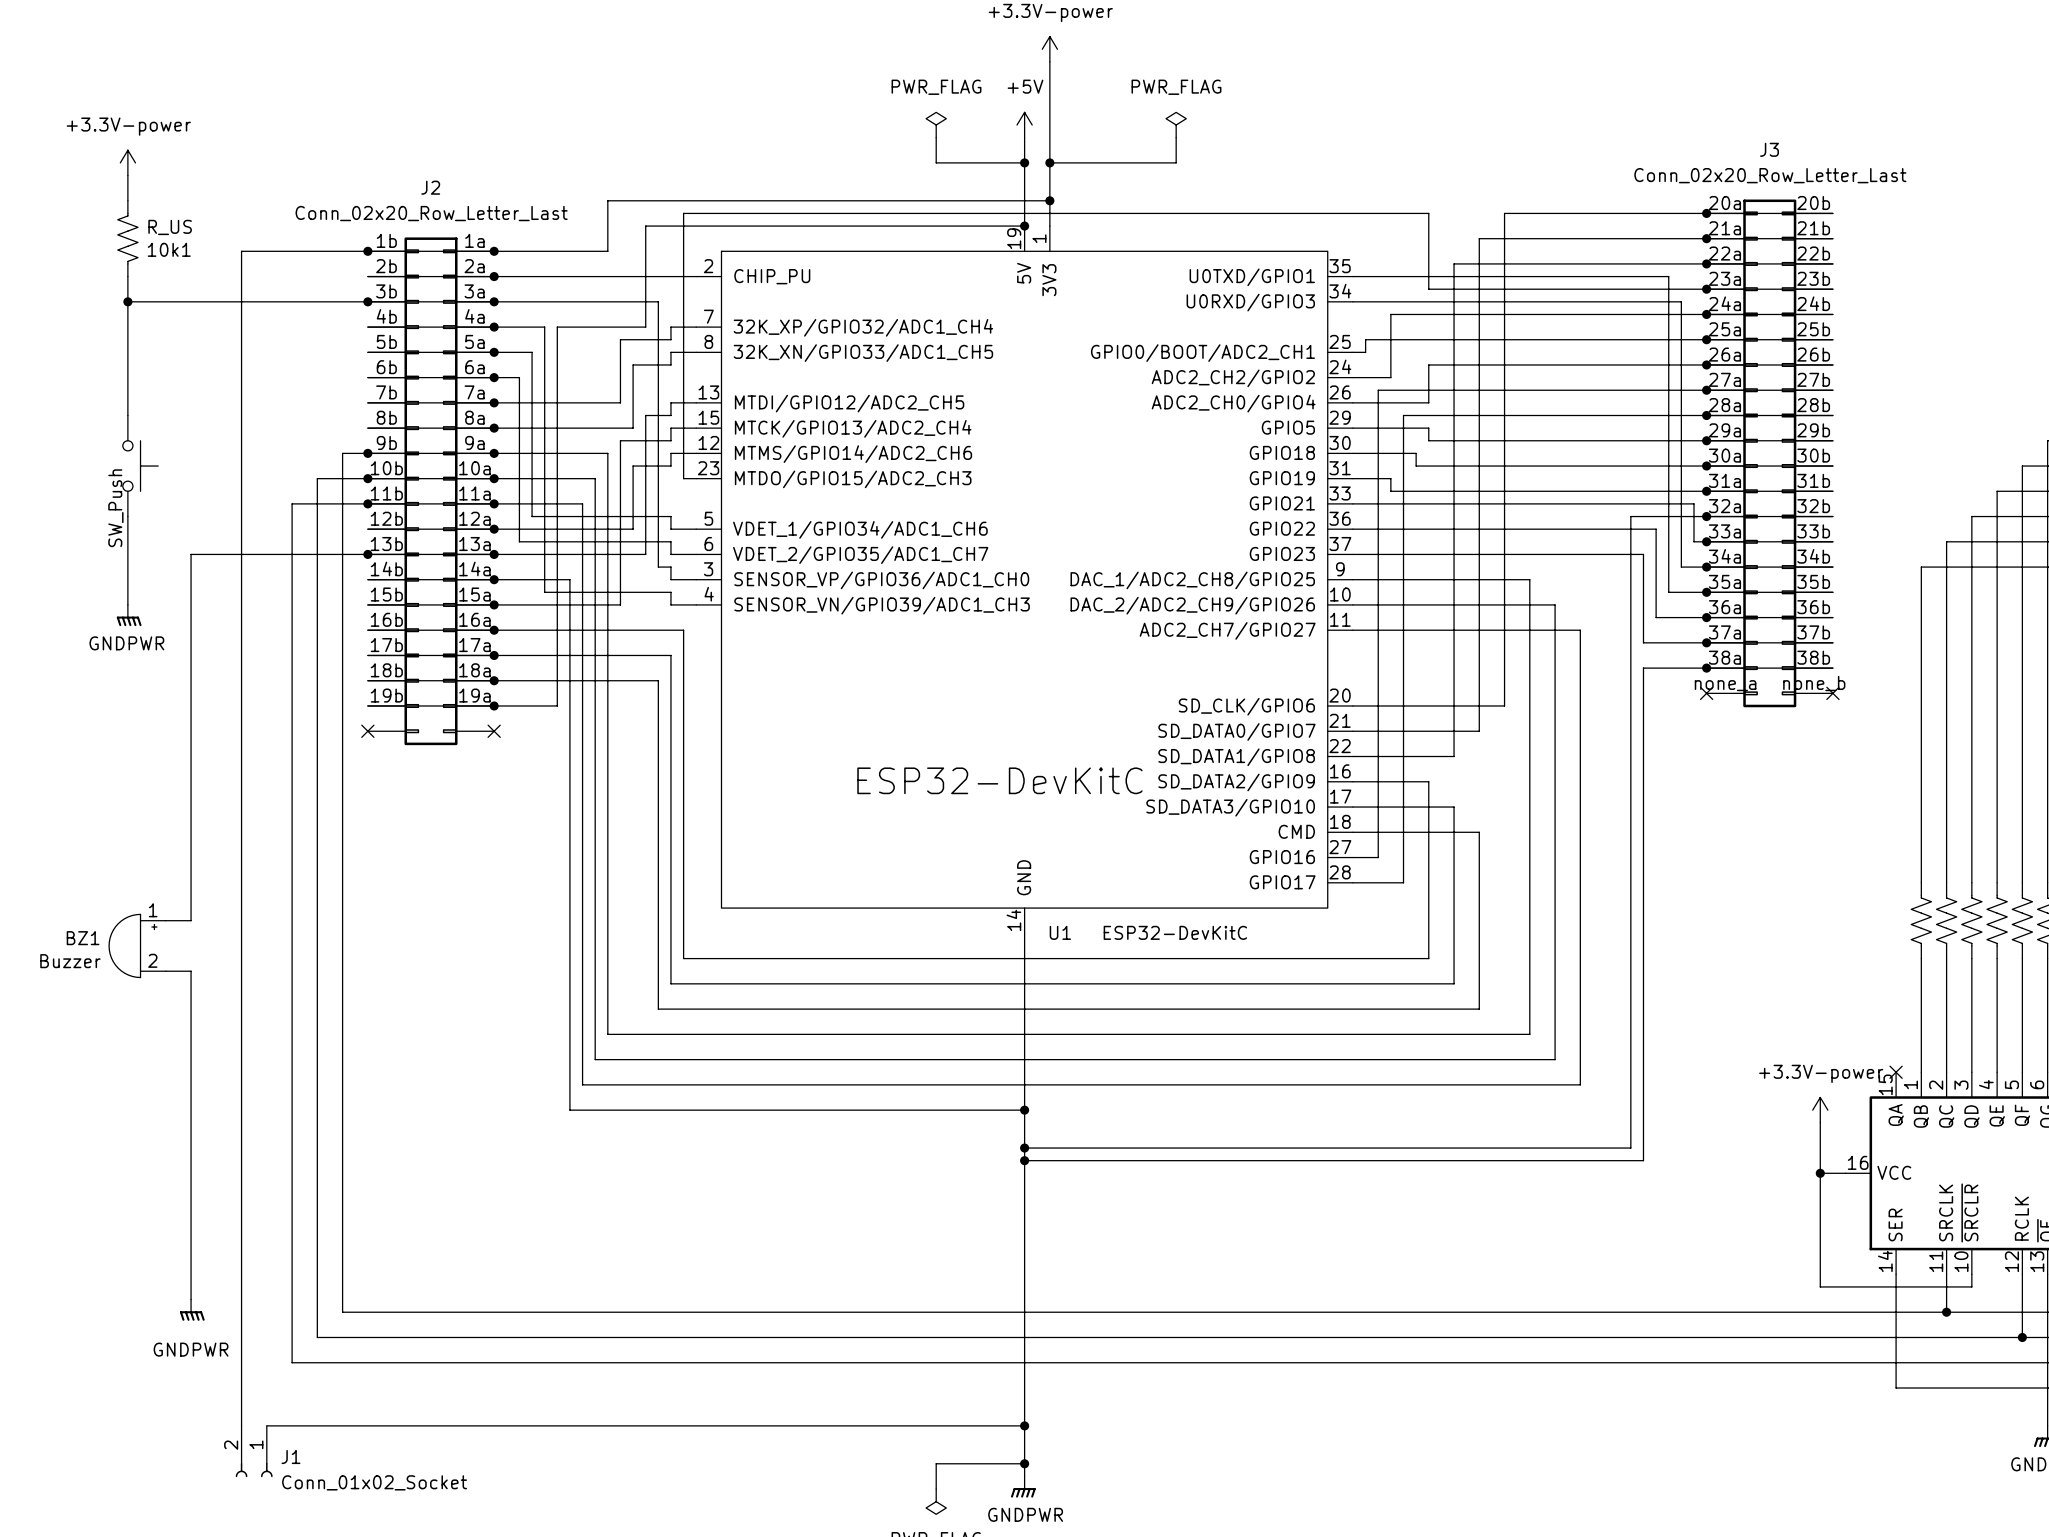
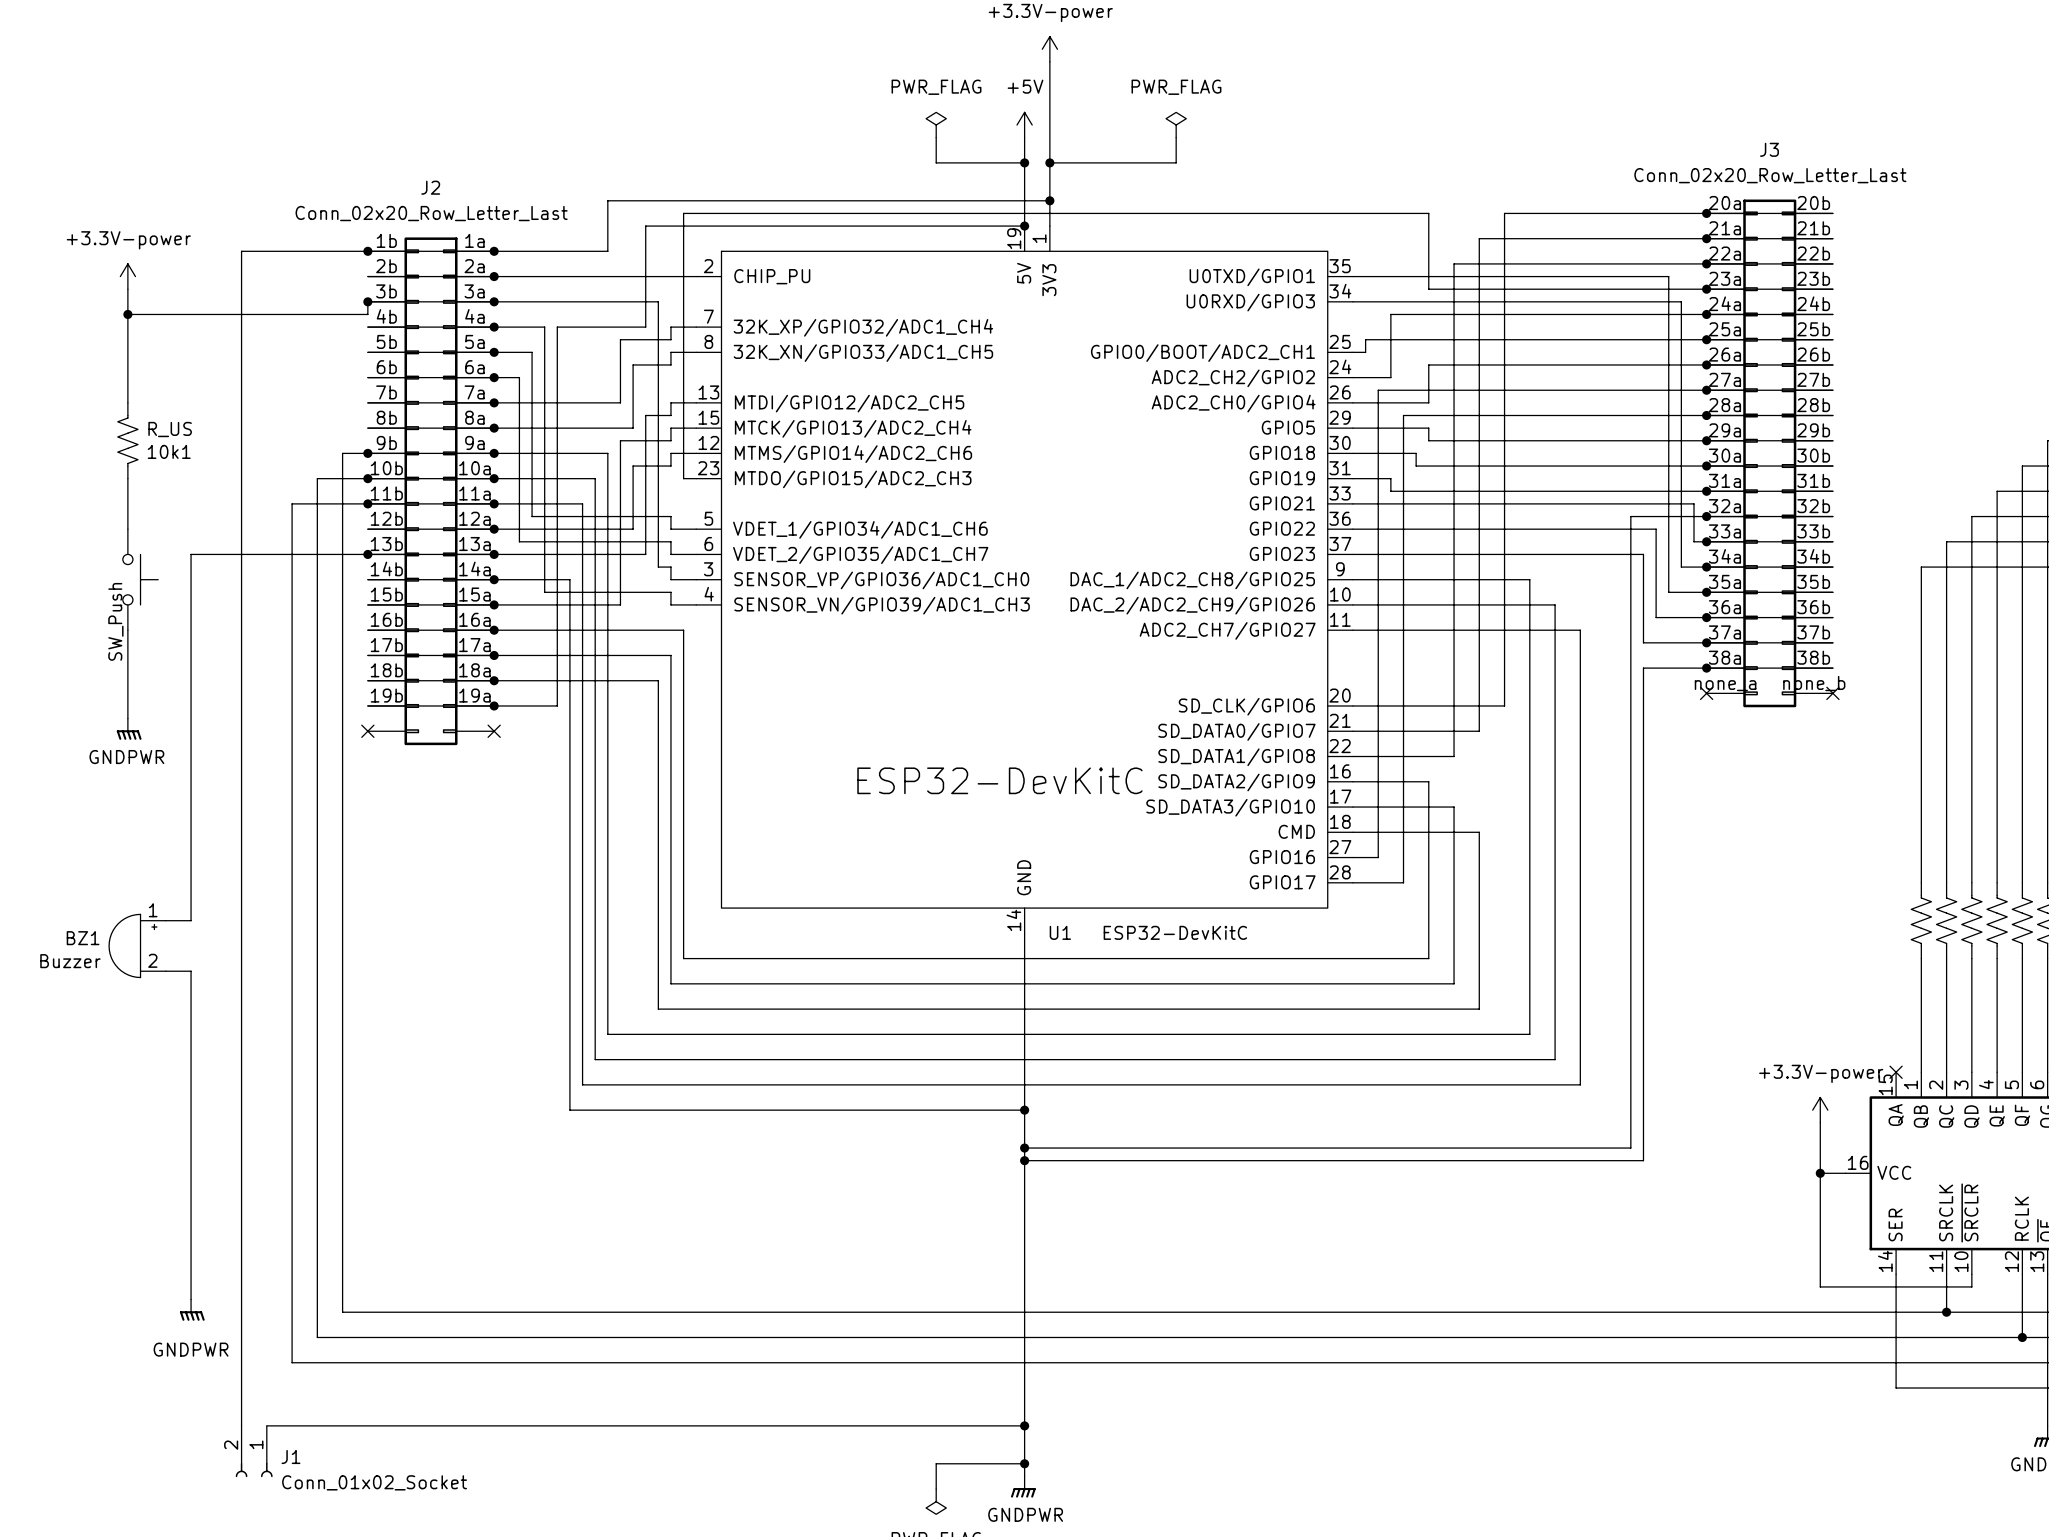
power symbol position: +3.3V-power (127, 162) -> +3.3V-power (127, 276)
wire: (127, 175) (127, 200) -> none
10k1 position: (127, 238) -> (127, 440)
wire: (127, 301) (367, 301) -> (127, 314) (367, 314) (367, 301)
junction position: (127, 301) -> (127, 314)
part position: (140, 466) -> (140, 579)
wire: (127, 529) (127, 604) -> none
power symbol position: GNDPWR (129, 615) -> GNDPWR (129, 729)
wire: none -> (127, 630) (127, 718)

